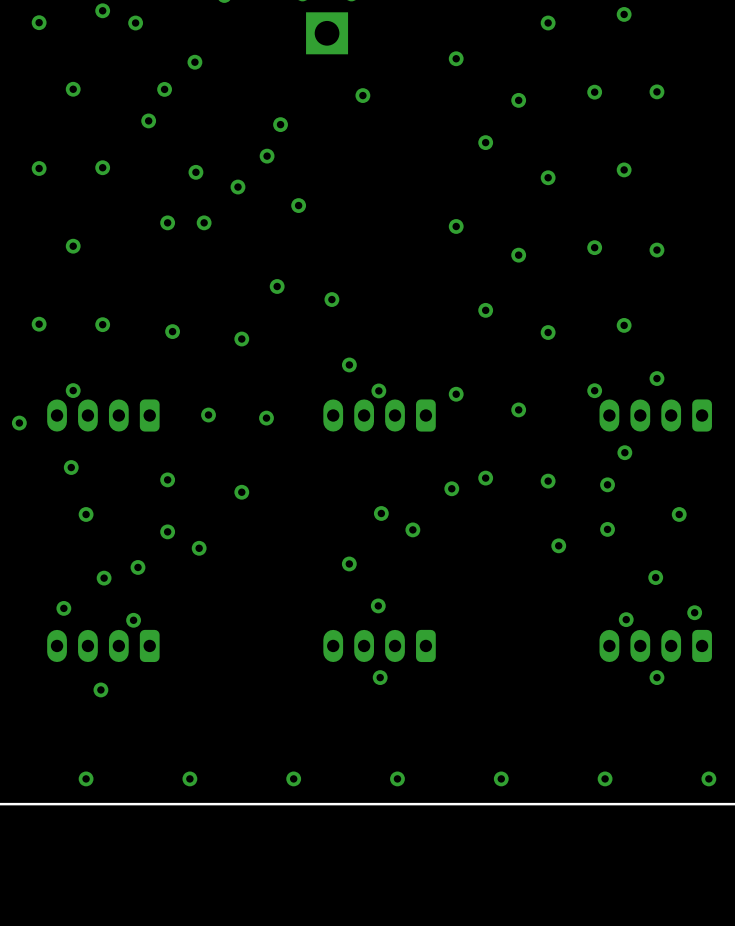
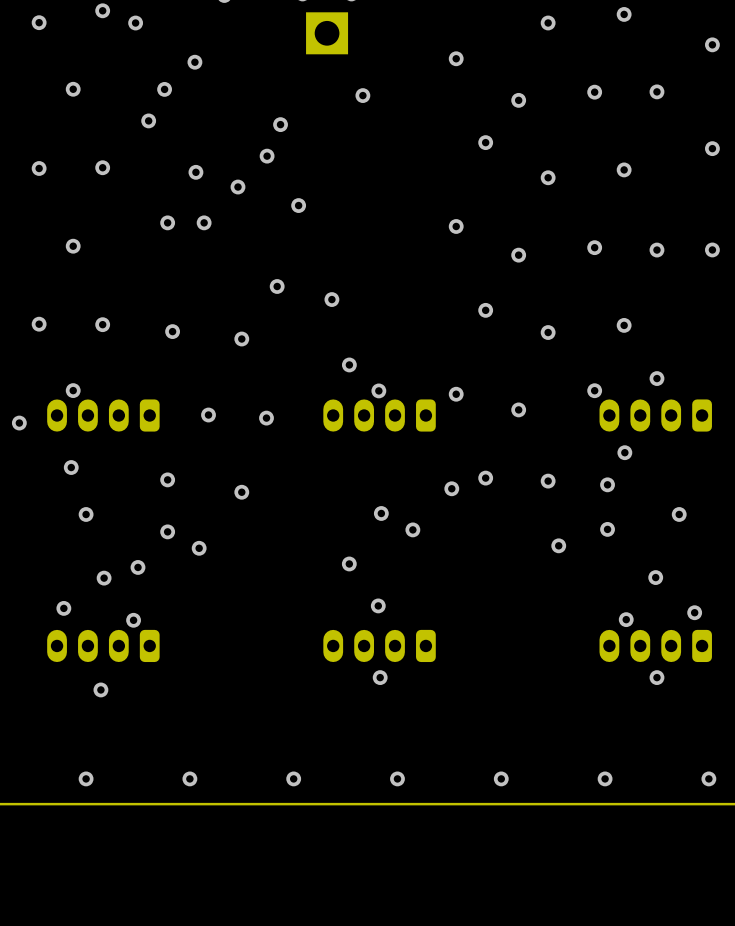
via: none -> (712, 44)
via: none -> (712, 148)
via: none -> (712, 249)

